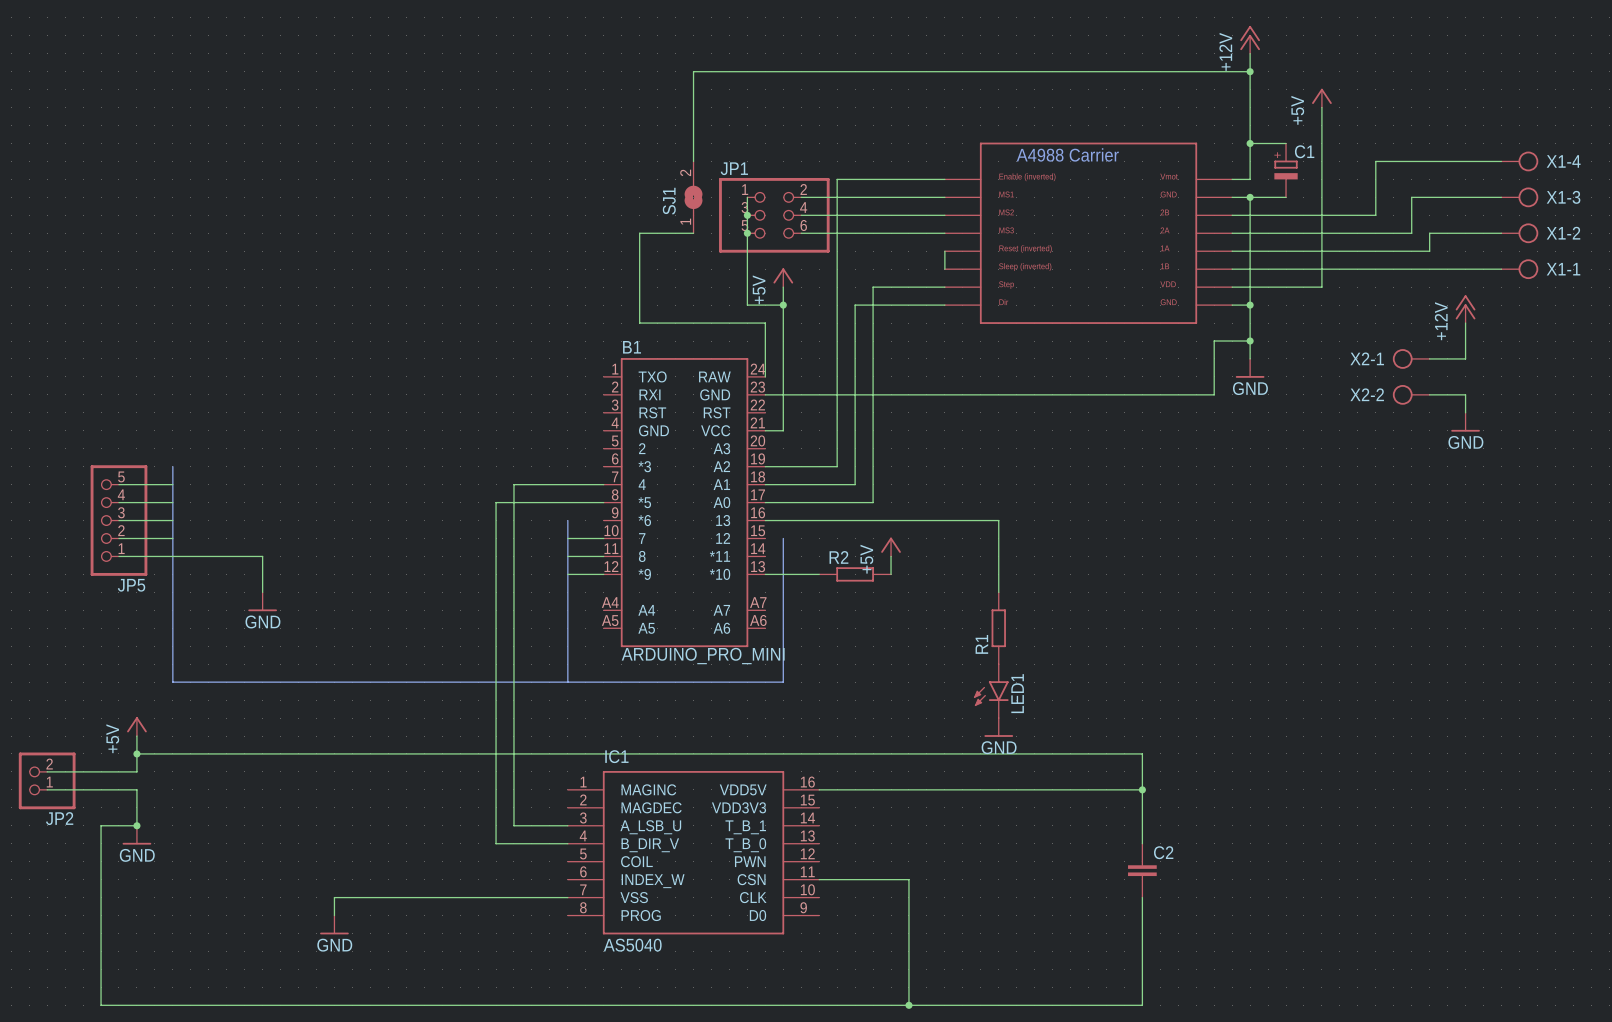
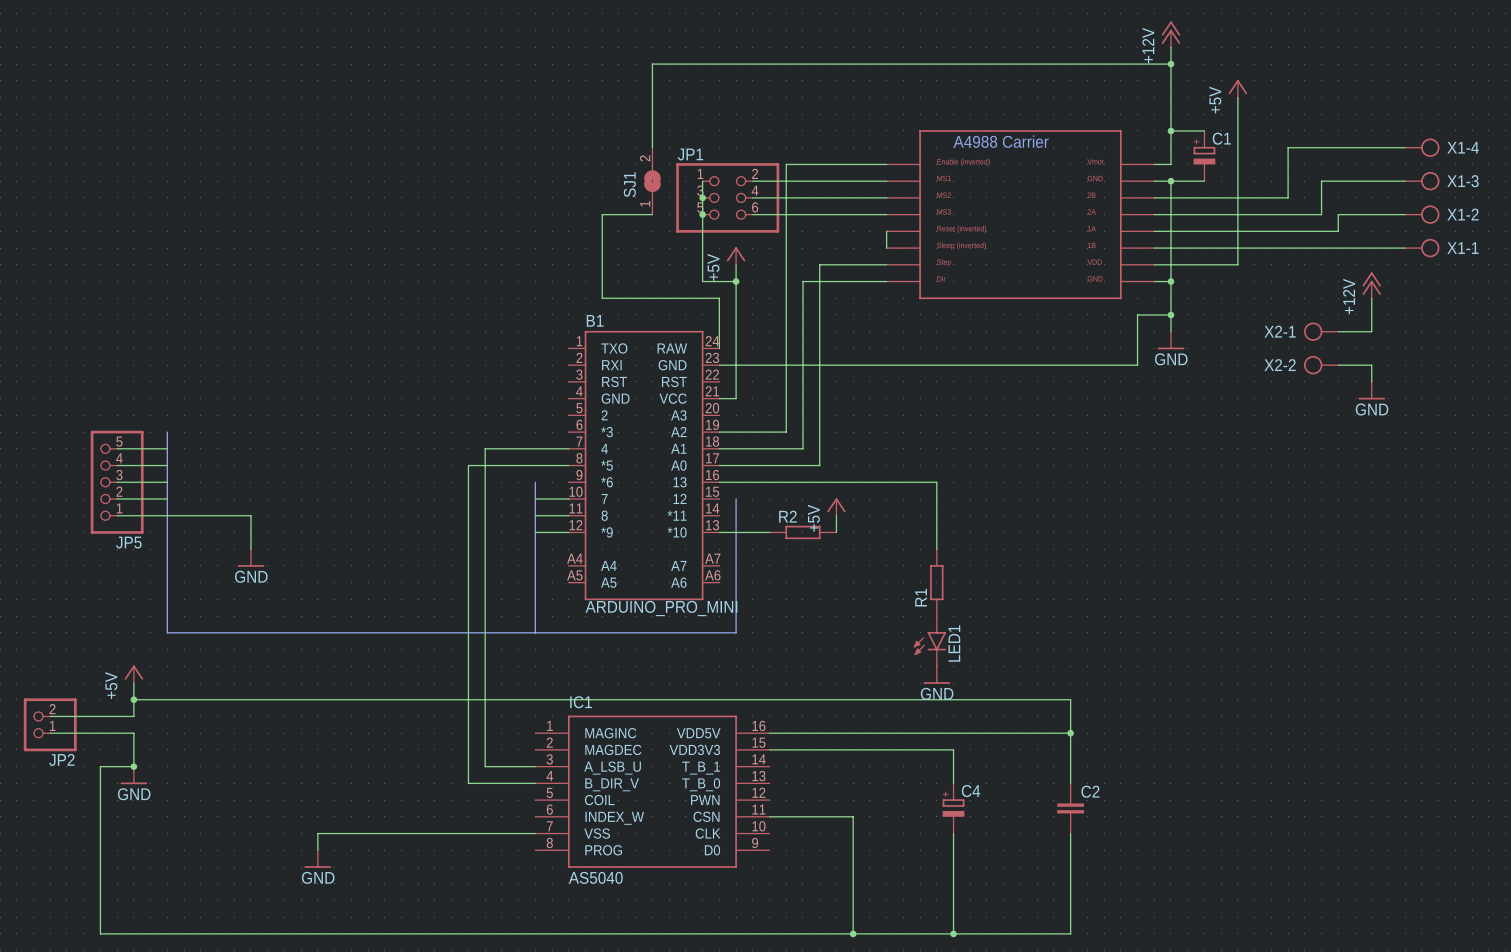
wire: none -> (769, 749) (953, 749) (953, 783)
C4: none -> (953, 808)
wire: none -> (953, 833) (953, 933)
junction: none -> (953, 933)

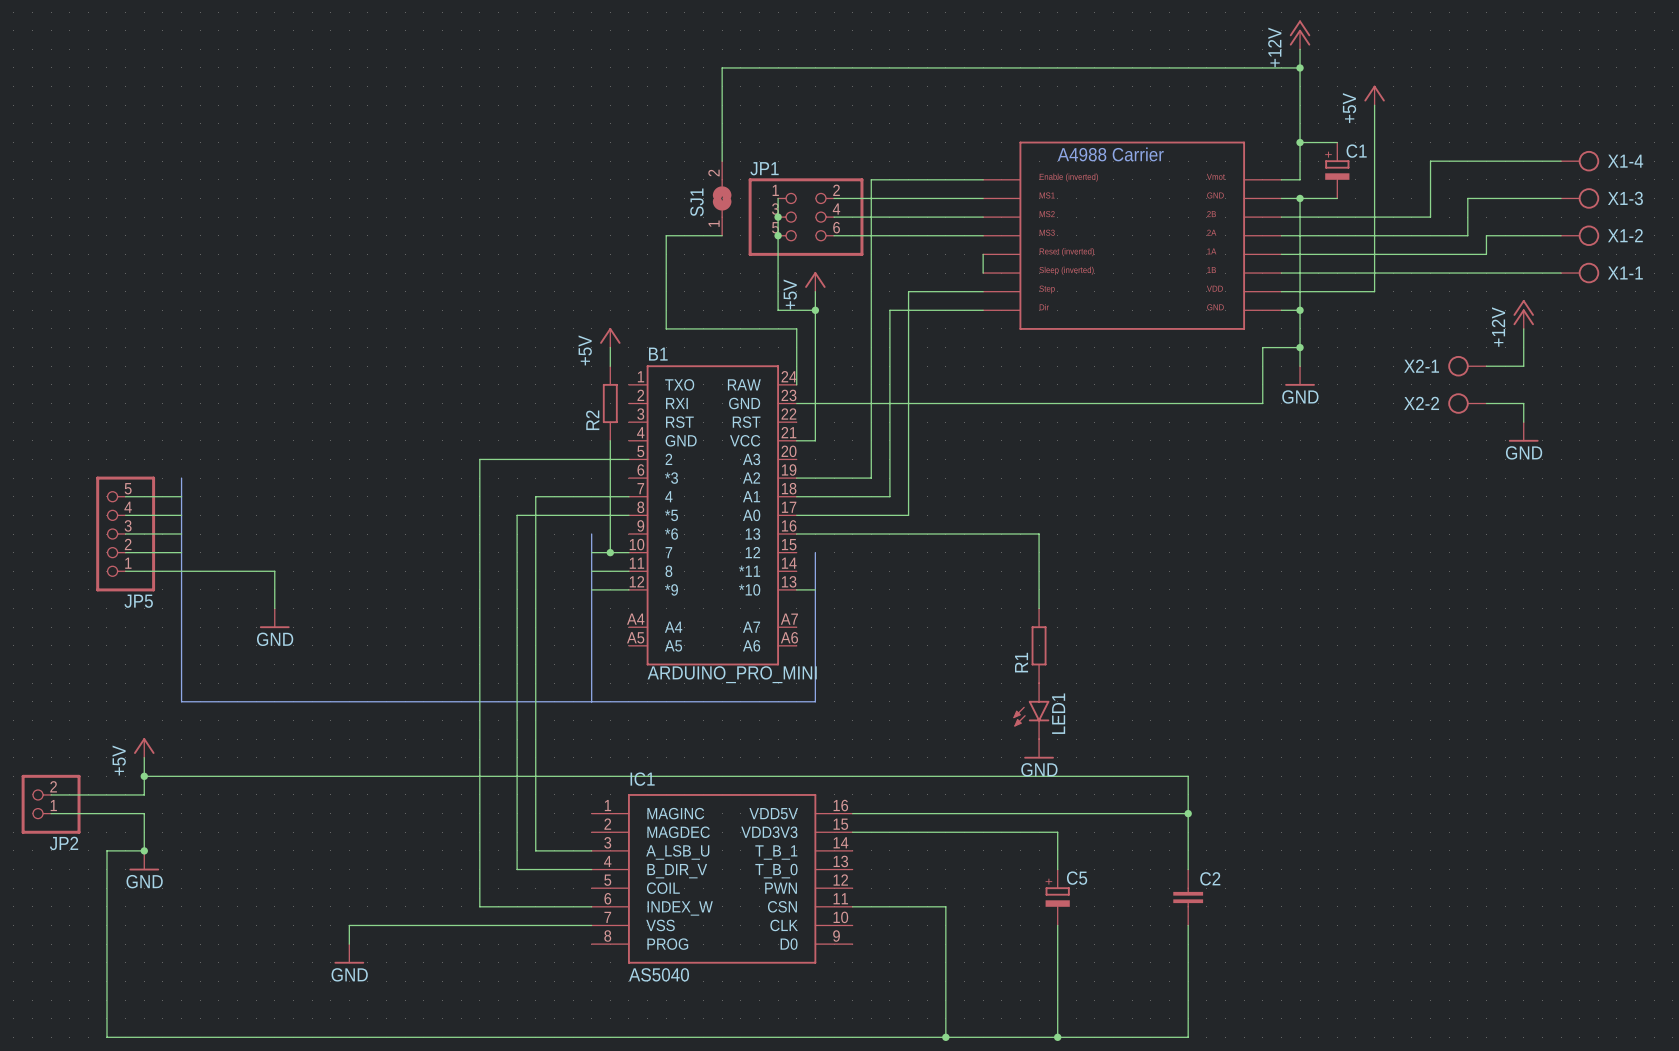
power symbol: none -> +5V (610, 337)
wire: none -> (610, 347) (610, 366)
wire: none -> (610, 440) (610, 552)
wire: none -> (628, 459) (479, 459) (479, 906) (591, 906)
junction: none -> (610, 552)
power symbol: +5V (836, 506) -> none
wire: (836, 515) (836, 532) -> none
R2 name position: R2 (787, 516) -> R2 (592, 420)
wire: (736, 532) (769, 532) -> none
R2 rotation: 0° (802, 532) -> 90° clockwise (610, 403)
R2 position: (802, 532) -> (610, 403)
C4 name: C4 (971, 791) -> C5 (1077, 878)

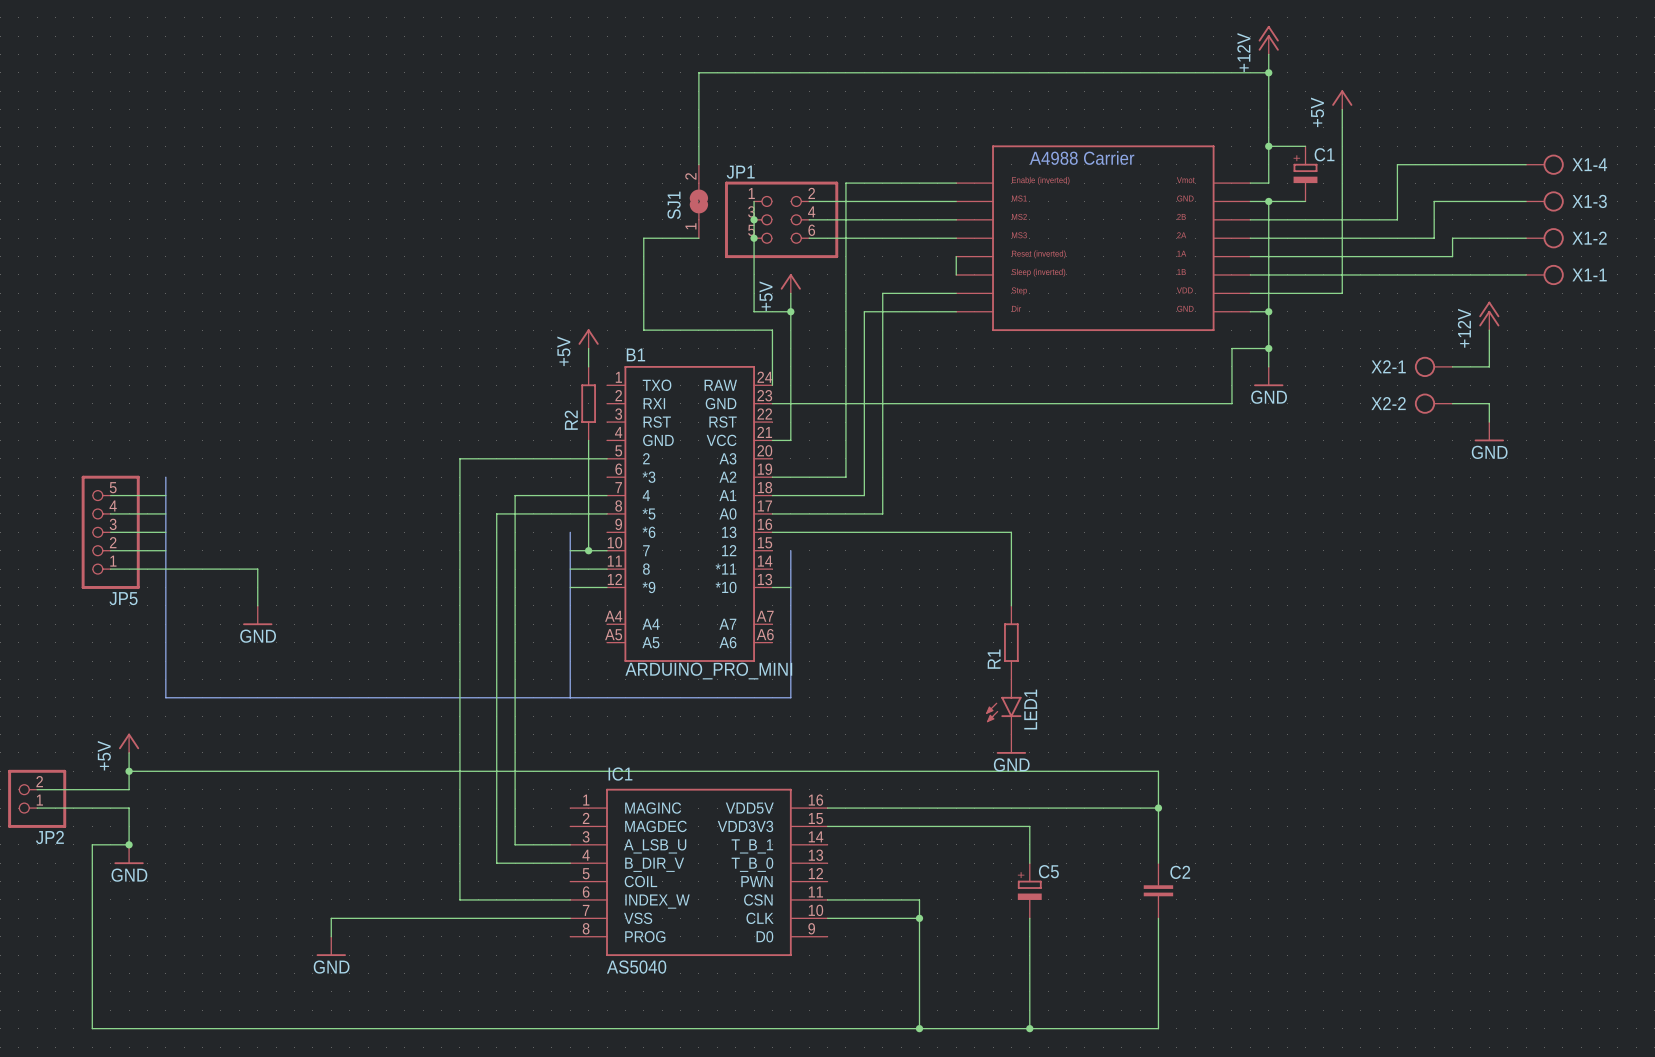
wire: none -> (827, 918) (919, 918)
junction: none -> (919, 918)

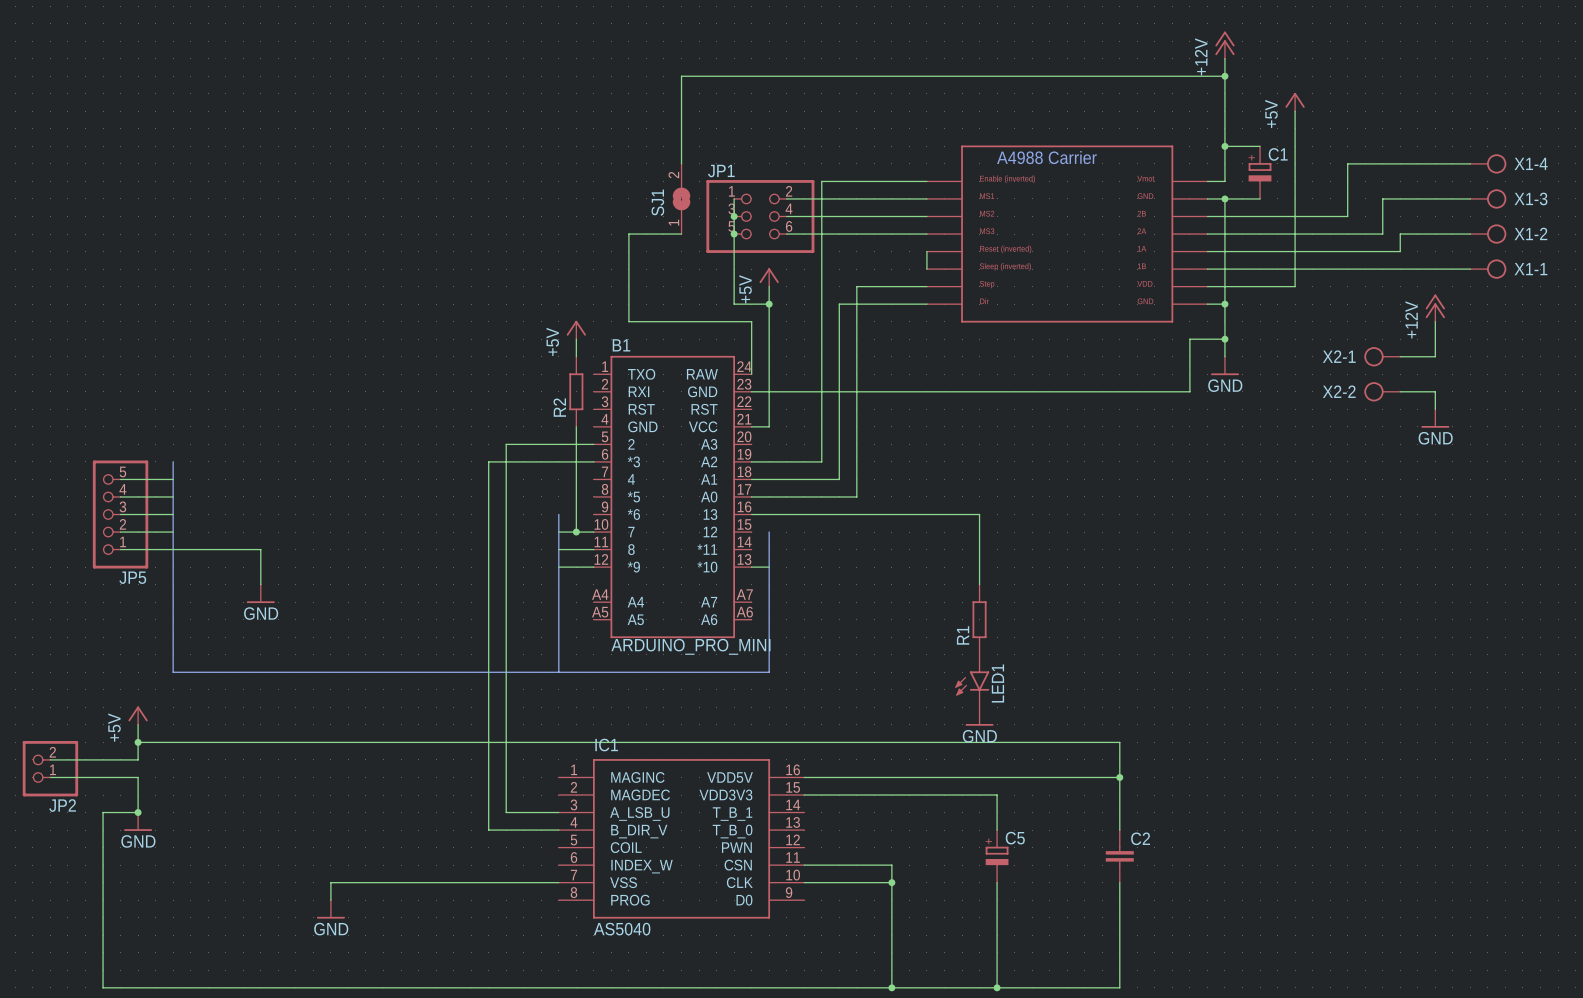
wire: (515, 458) (459, 458) (459, 899) (570, 899) -> none
wire: (515, 495) (607, 495) -> (506, 479) (506, 444)
wire: (496, 513) (607, 513) -> (488, 496) (488, 461) (593, 461)

